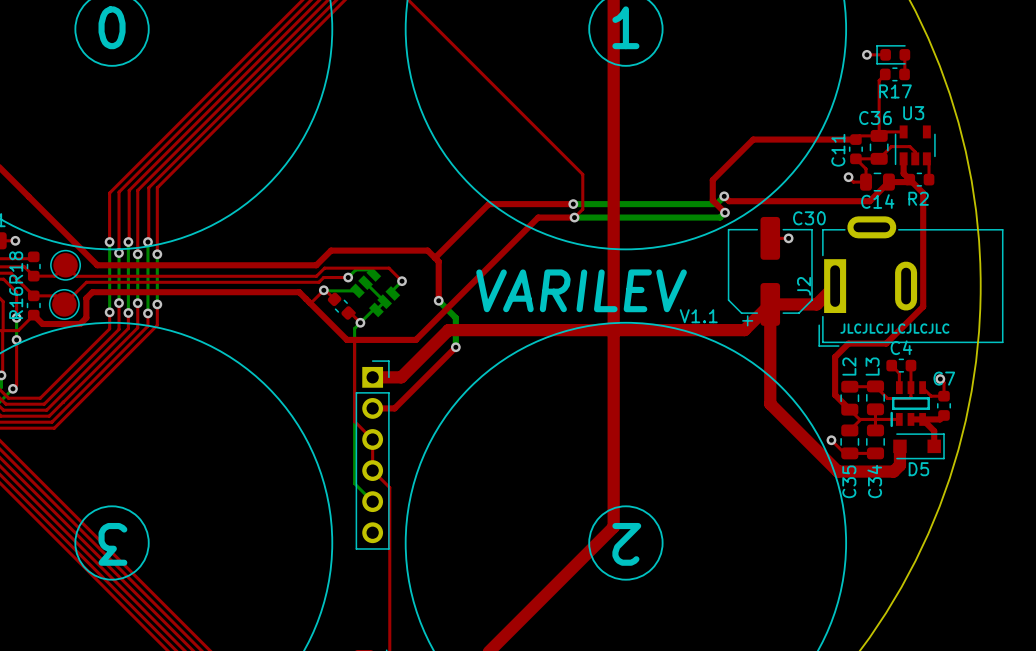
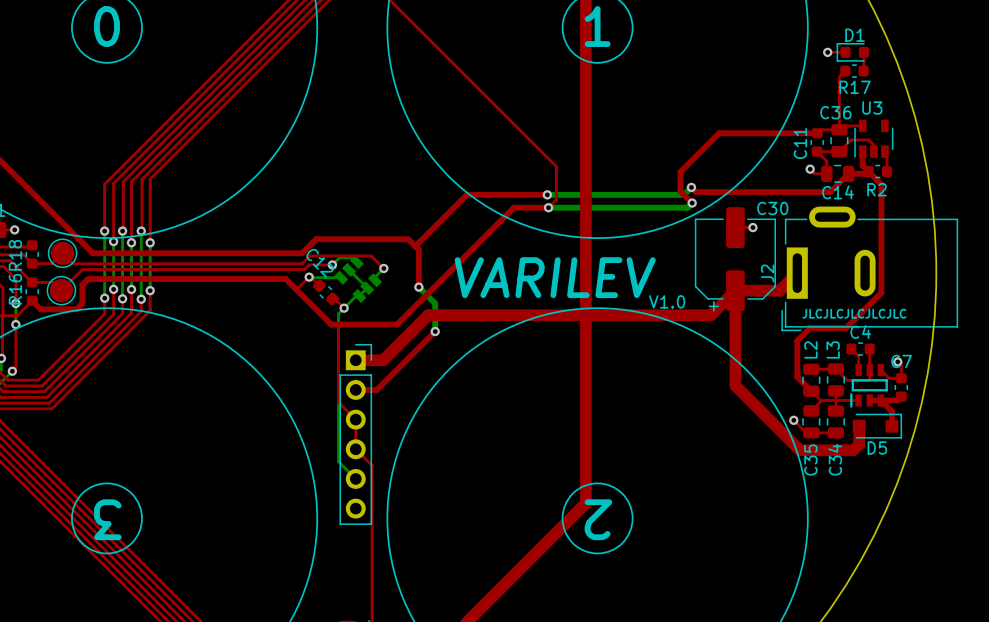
D1 name: none -> D1 (854, 35)
C12 name: none -> C12 (320, 263)
text: V1.1 (698, 316) -> V1.0 (667, 301)

